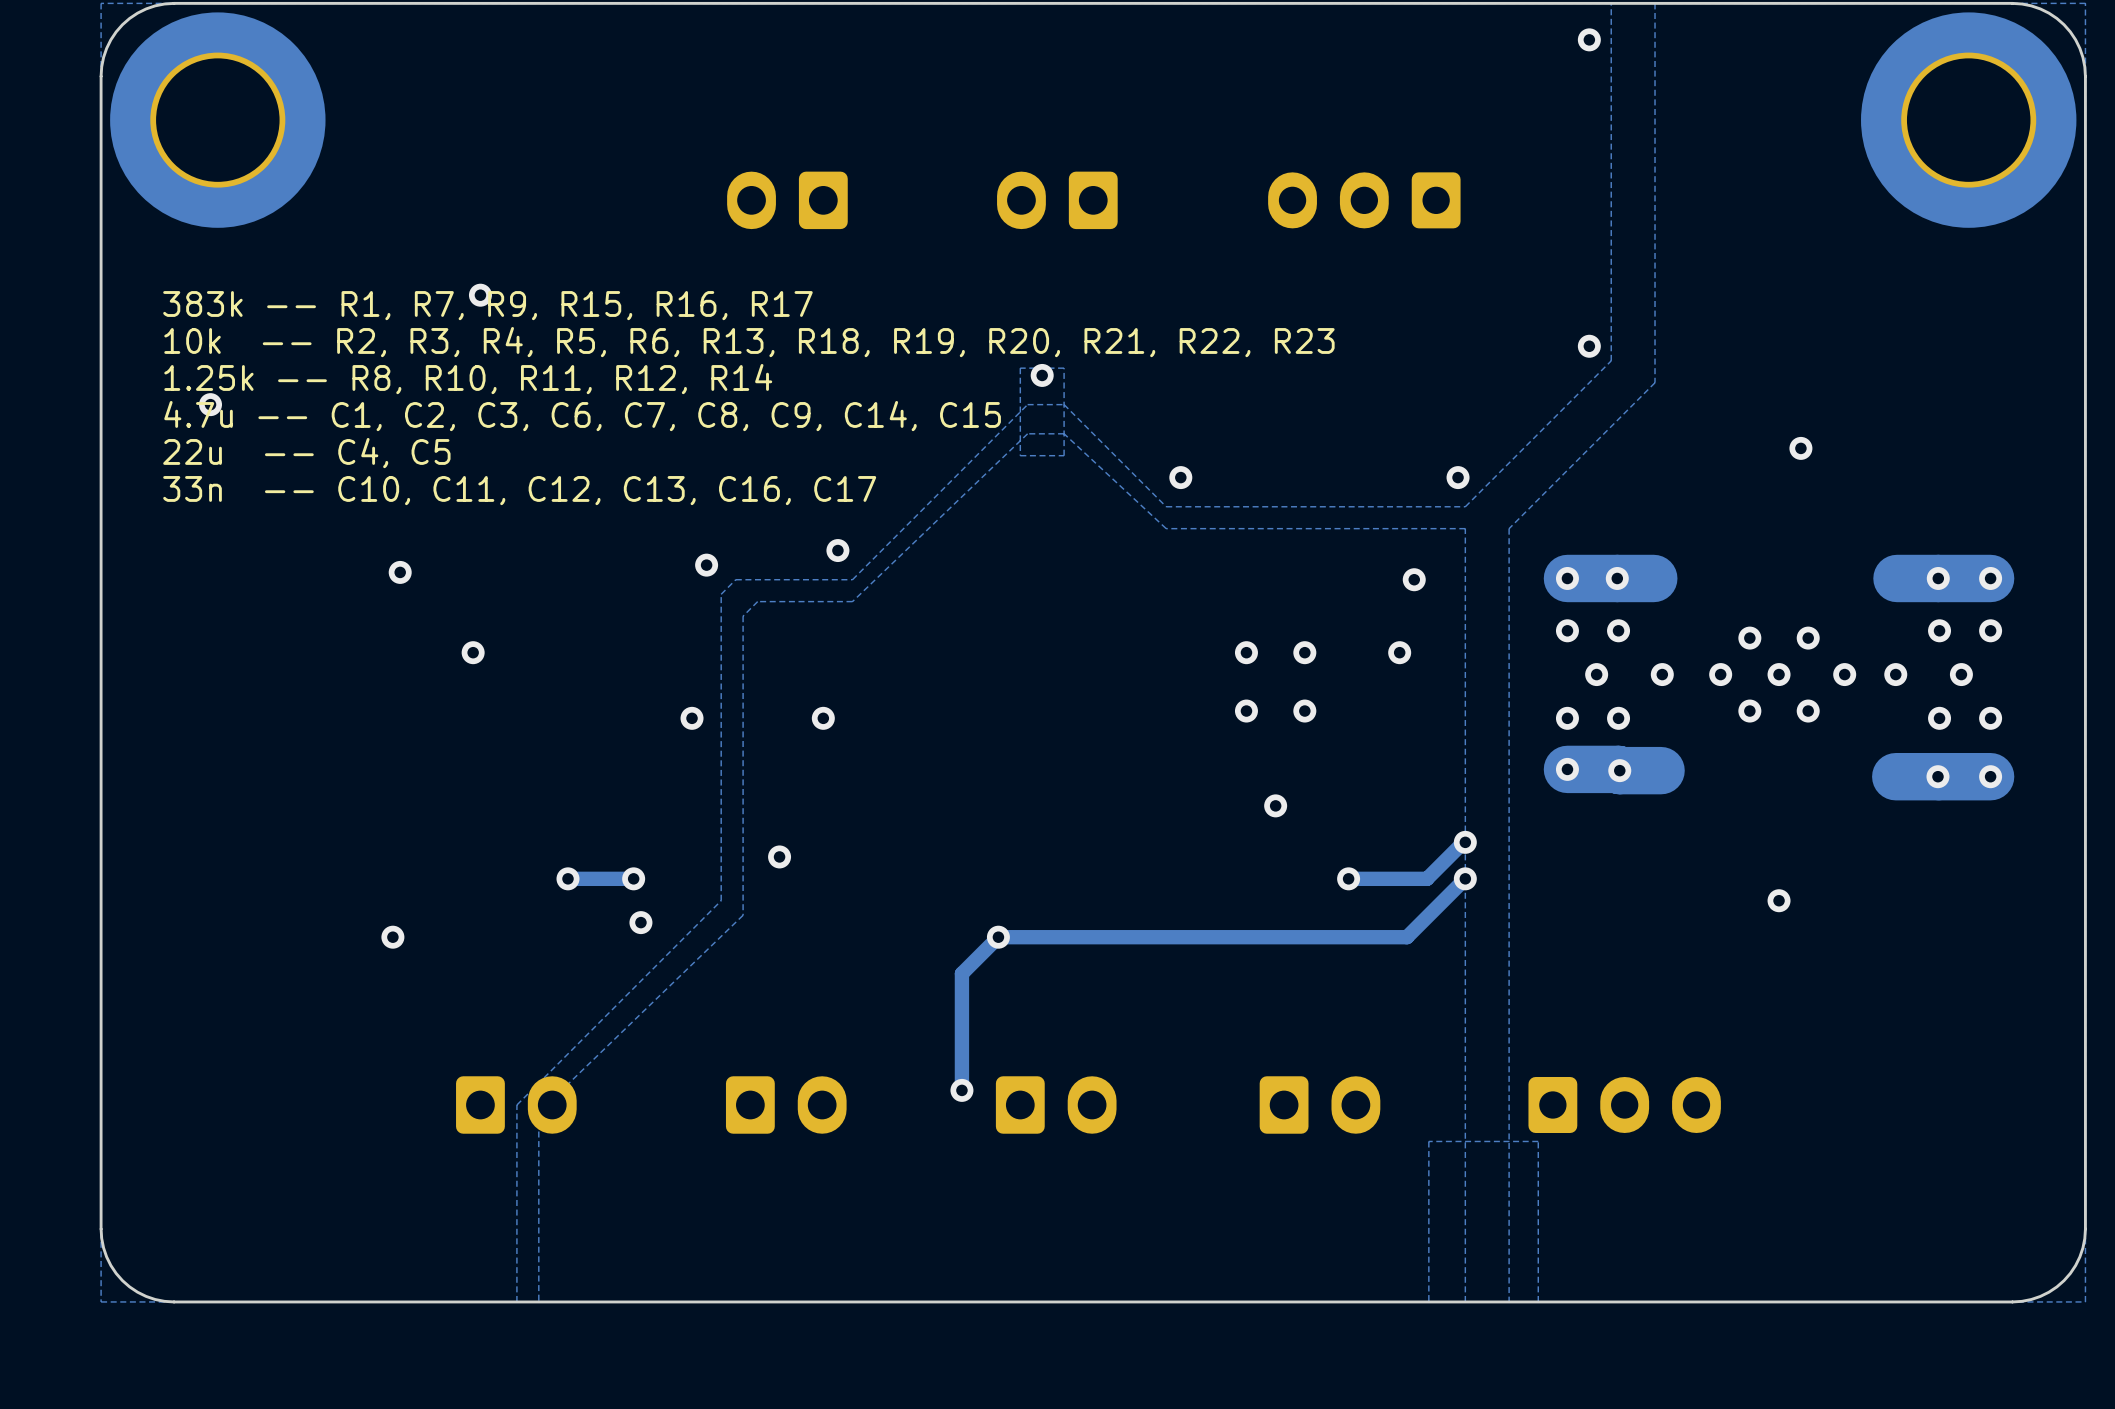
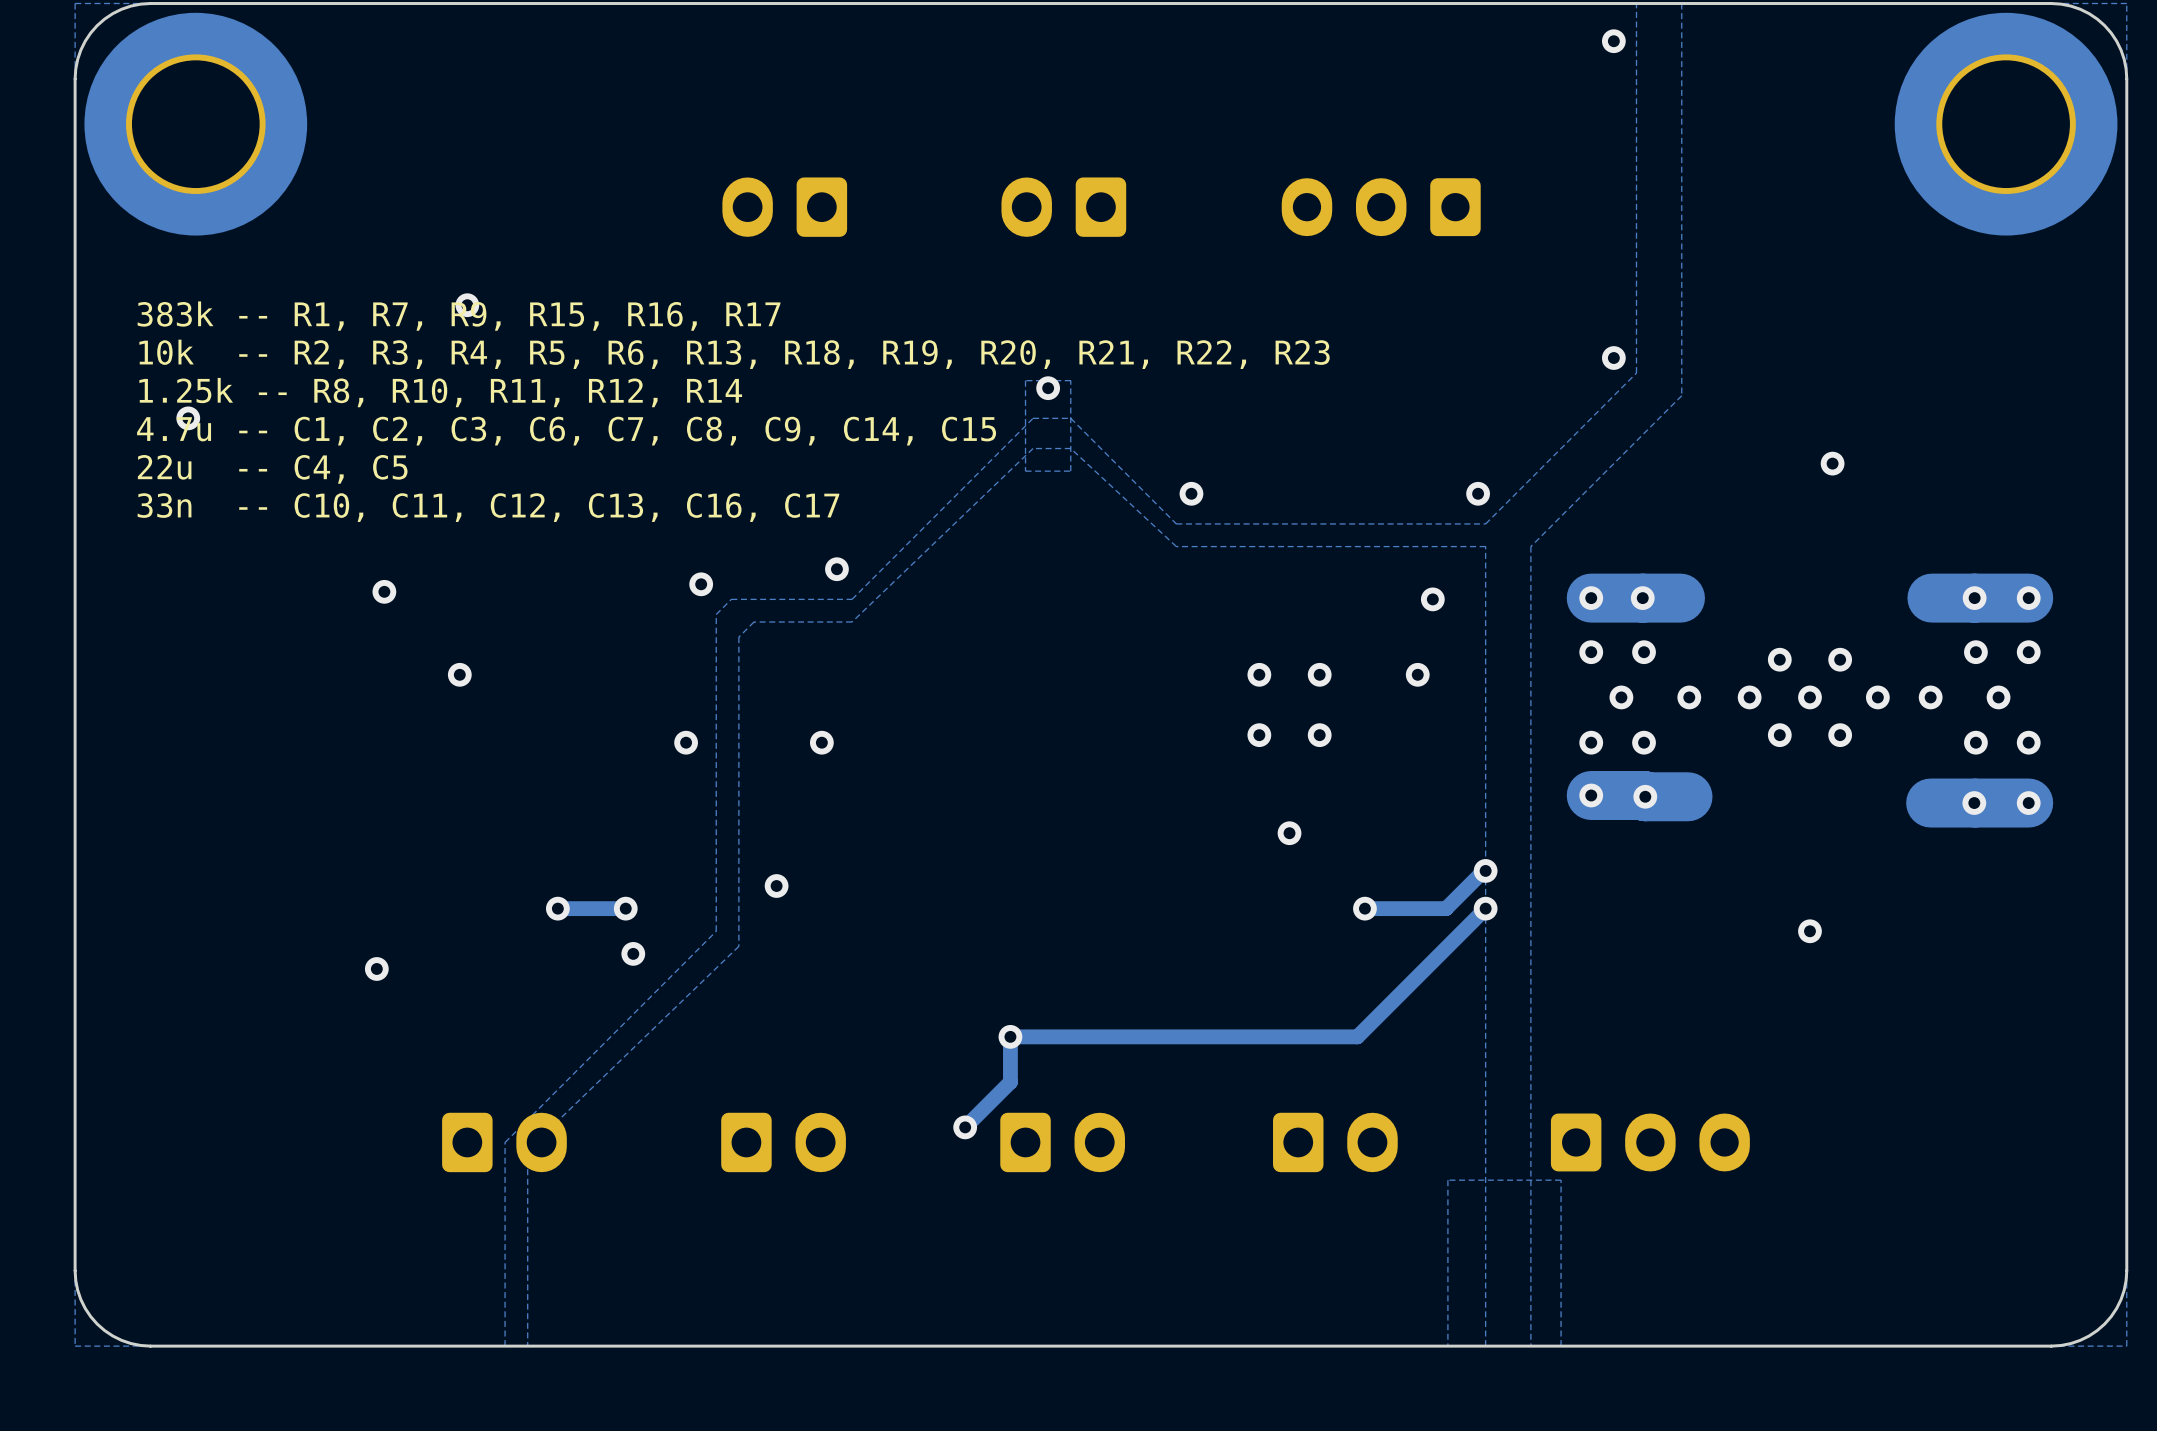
via position: (998, 937) -> (1010, 1036)
track: (1406, 937) (998, 937) (961, 973) (961, 1090) -> (1425, 968) (1357, 1036) (1010, 1036) (1010, 1082) (965, 1127)

